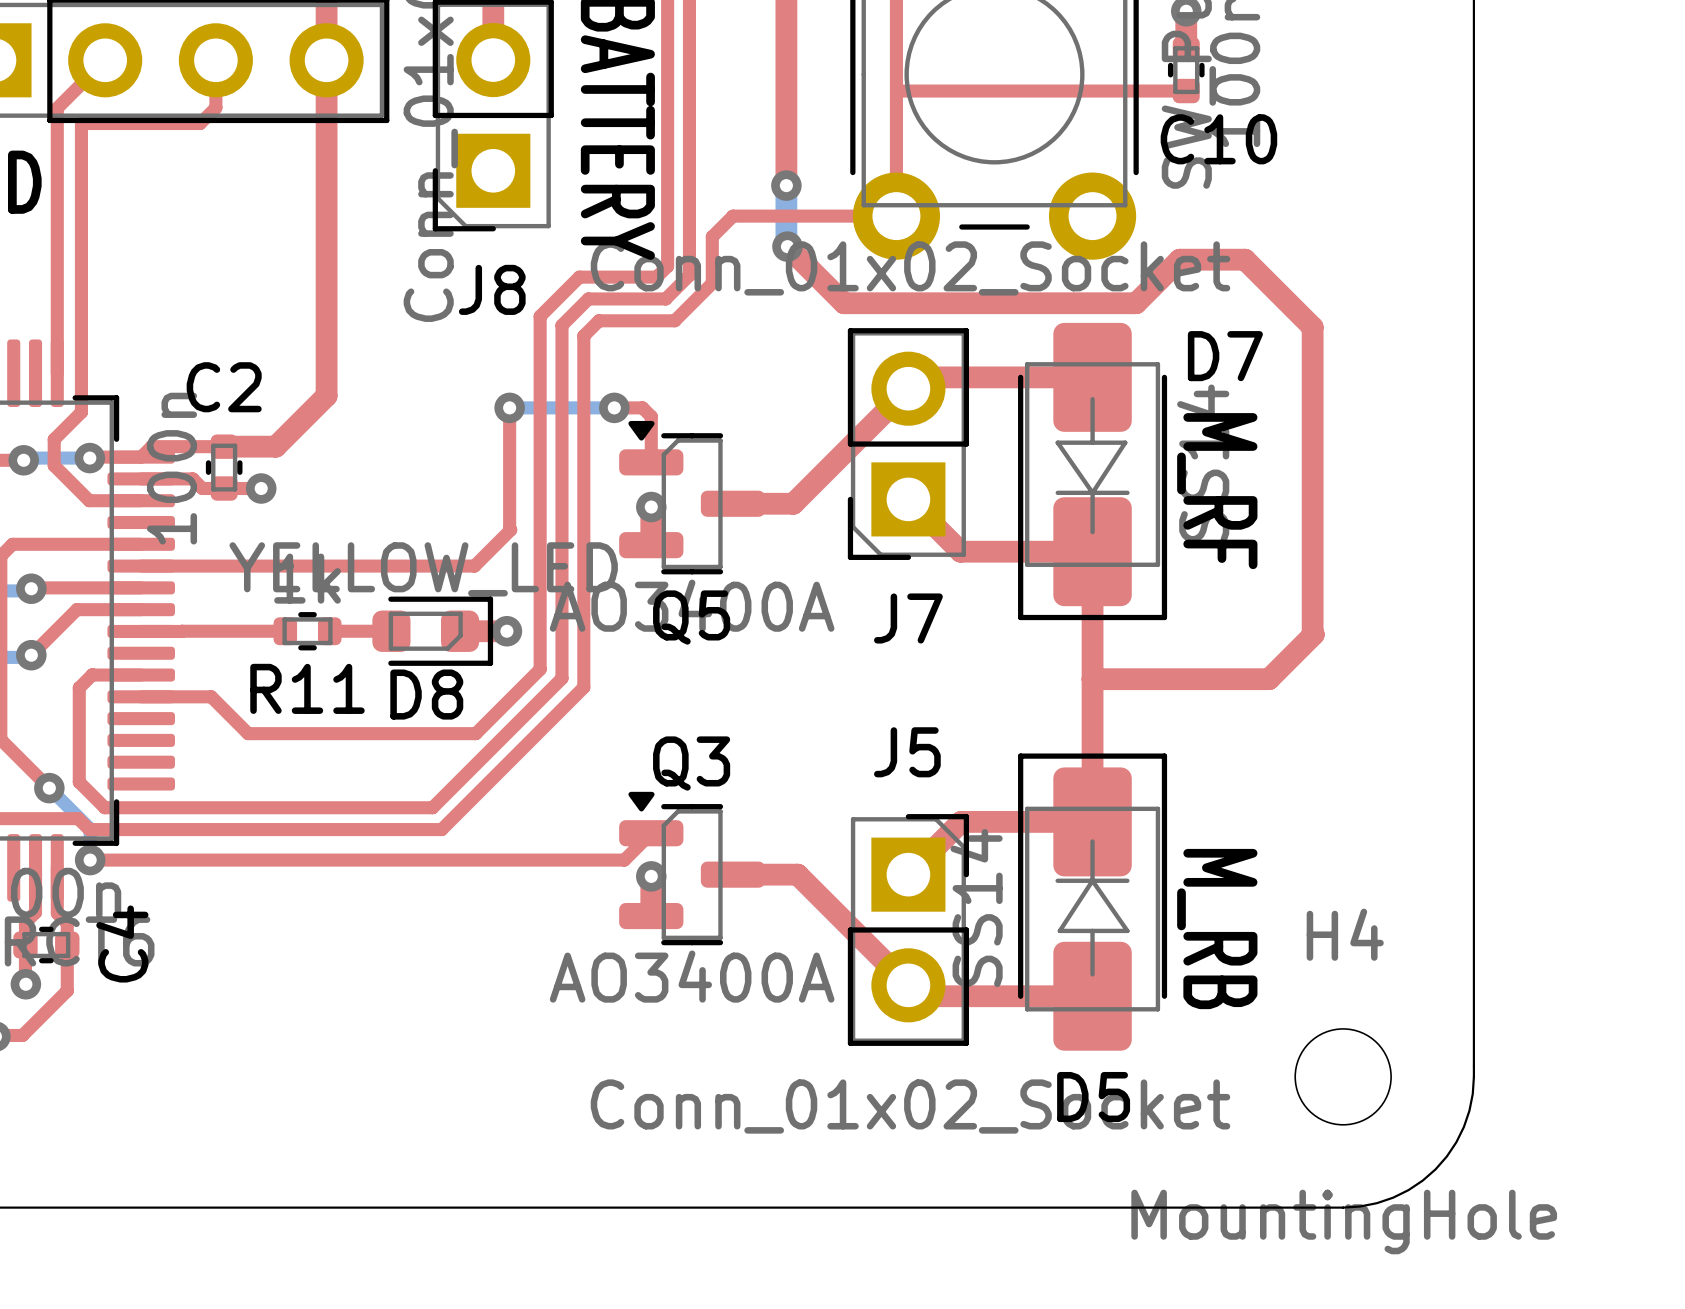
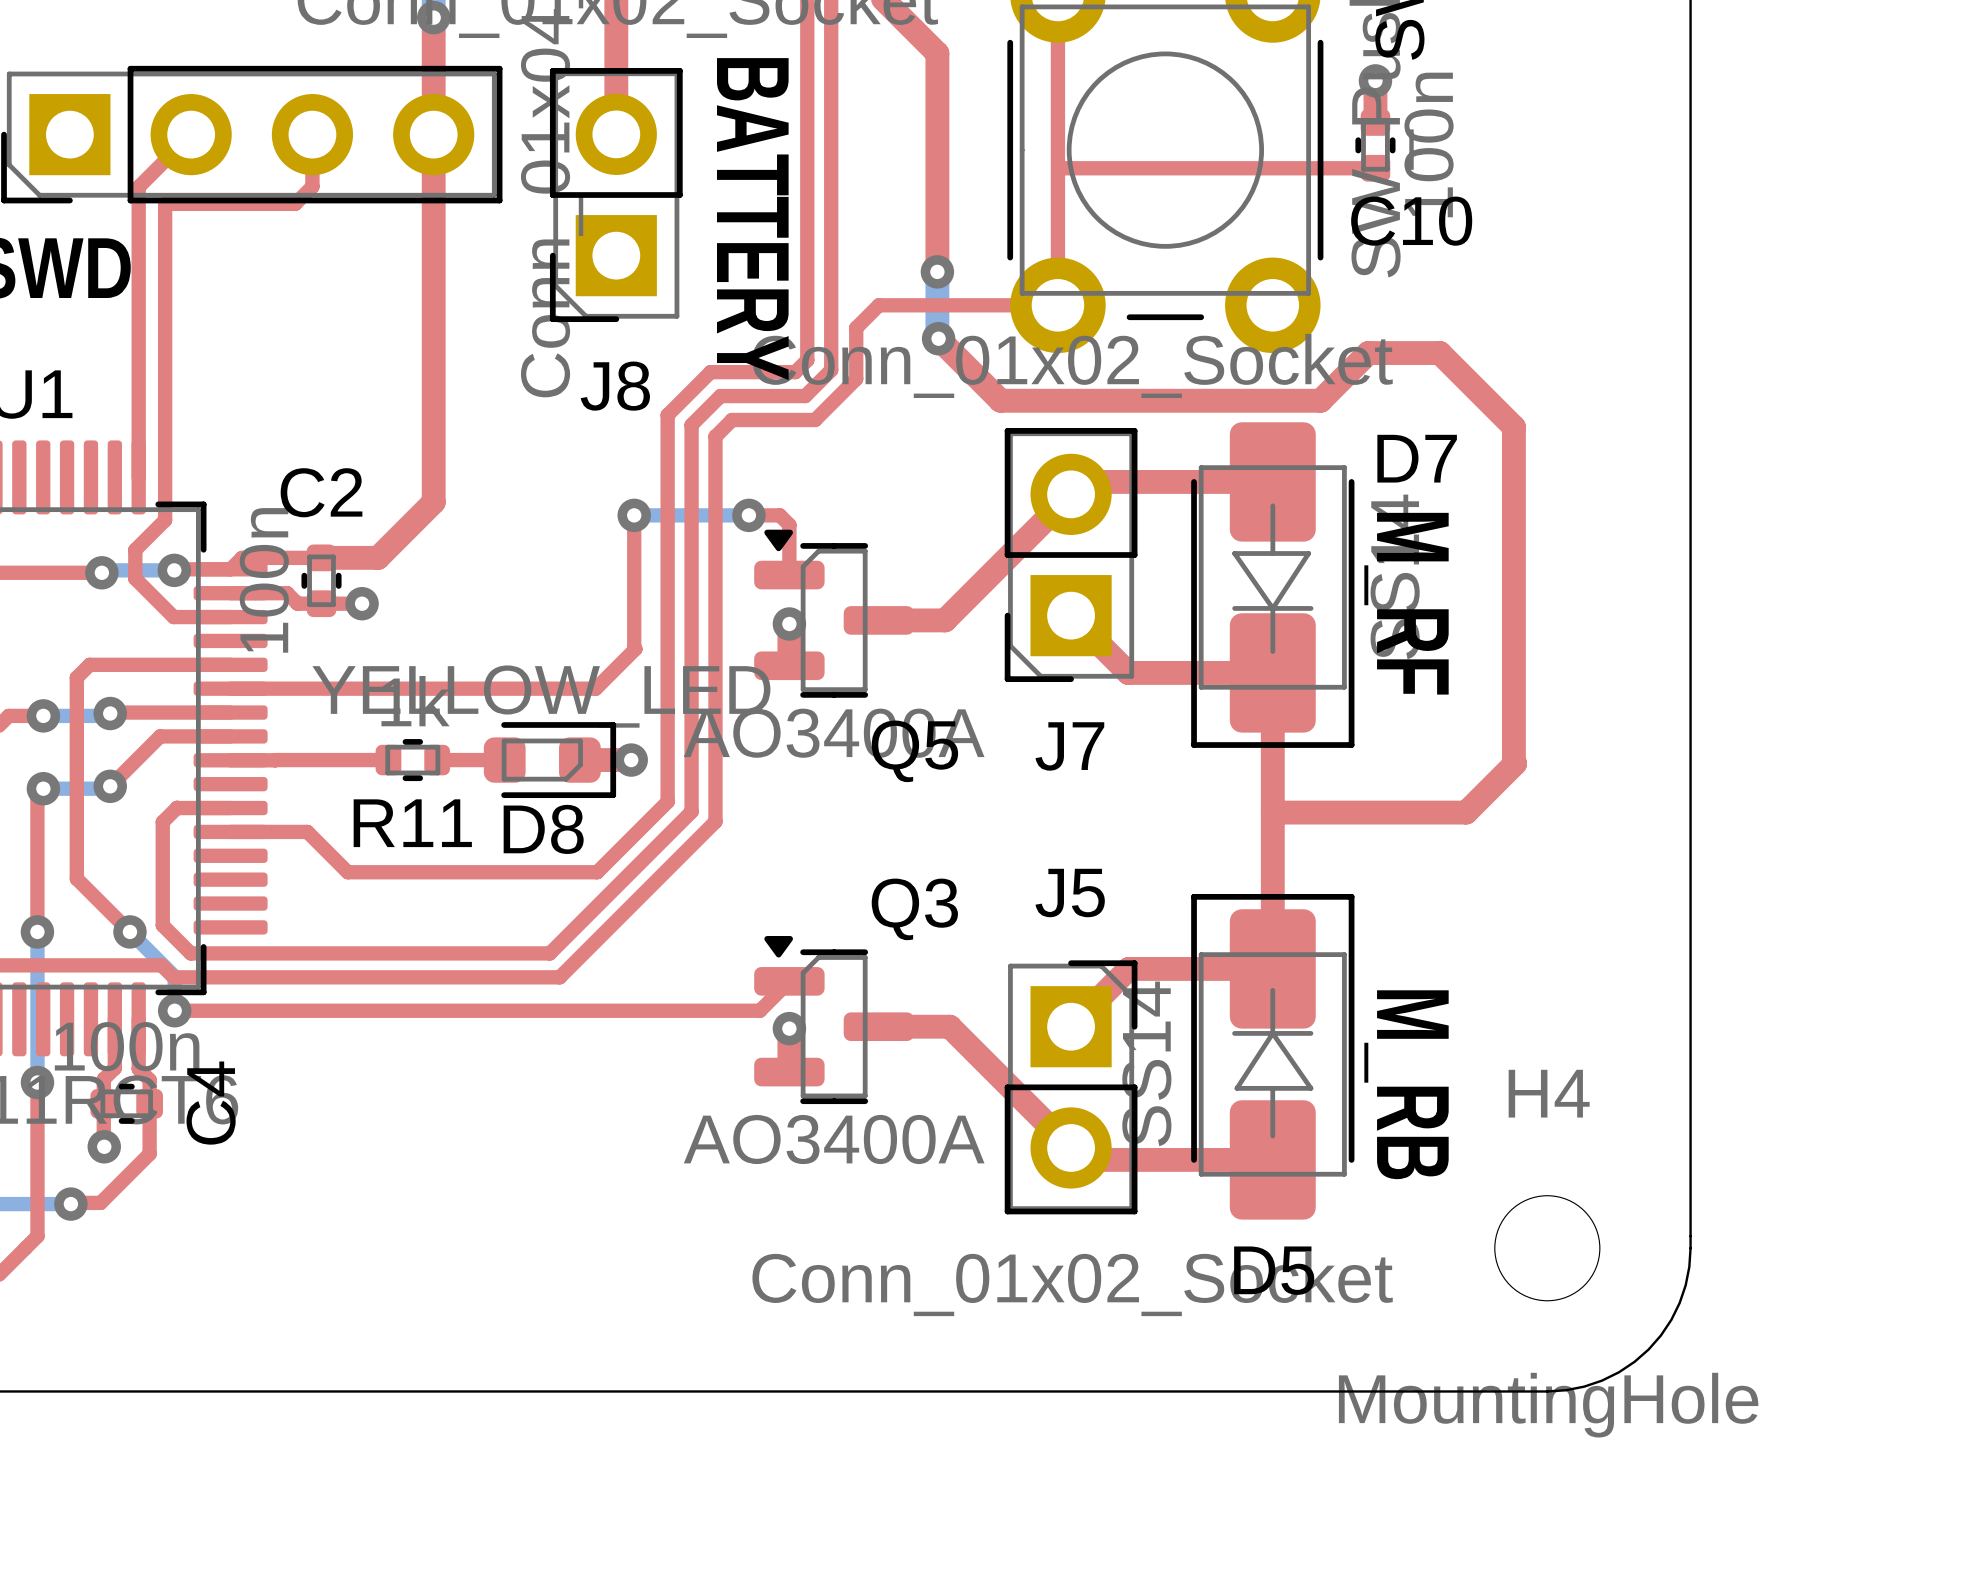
Q5 name position: Q5 (691, 617) -> Q5 (914, 751)
Q3 name position: Q3 (691, 763) -> Q3 (914, 909)

